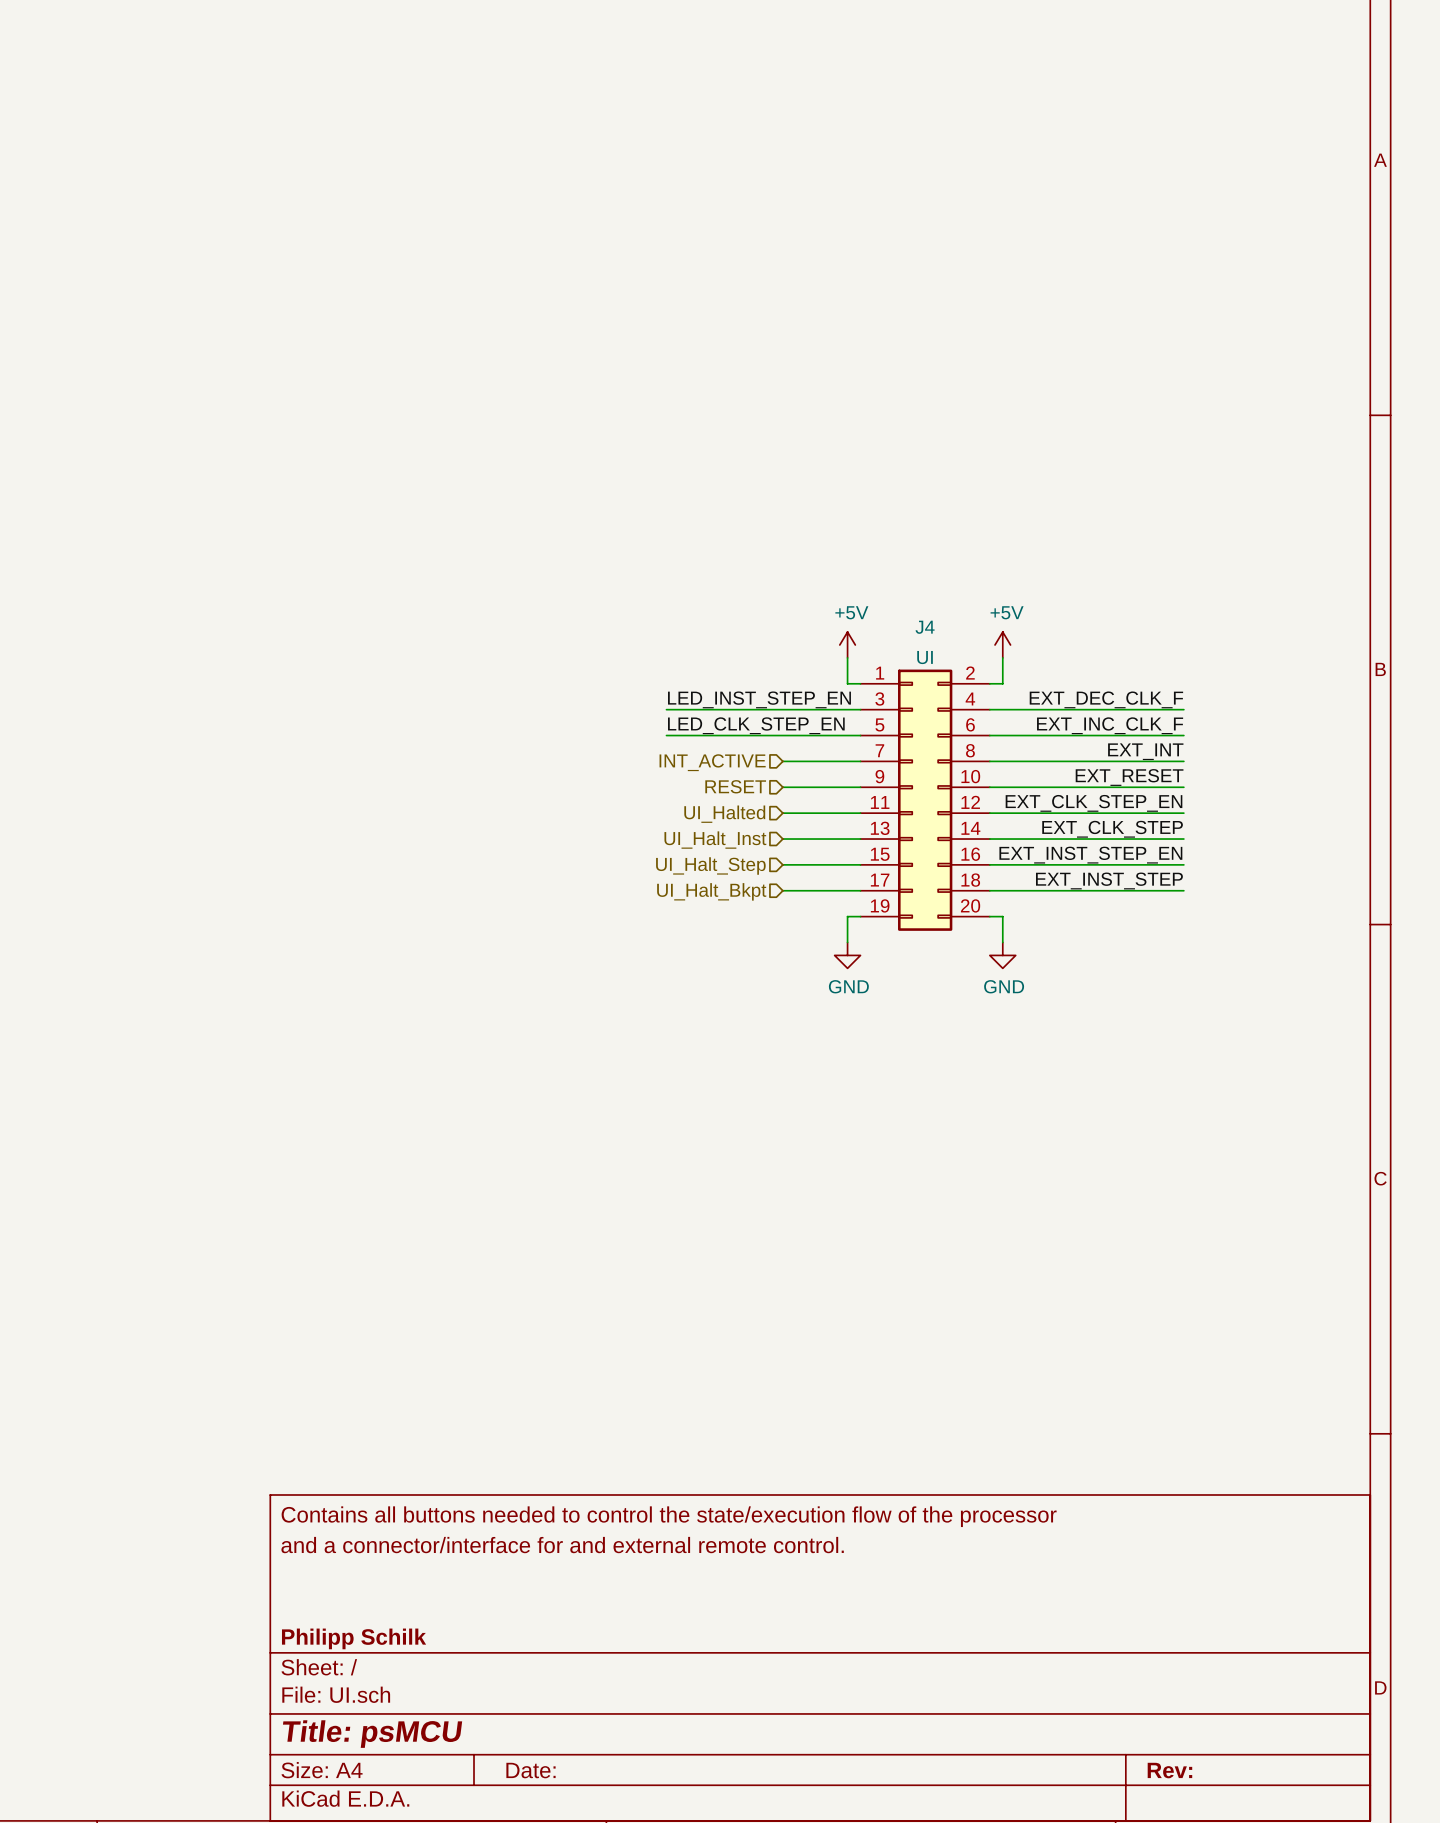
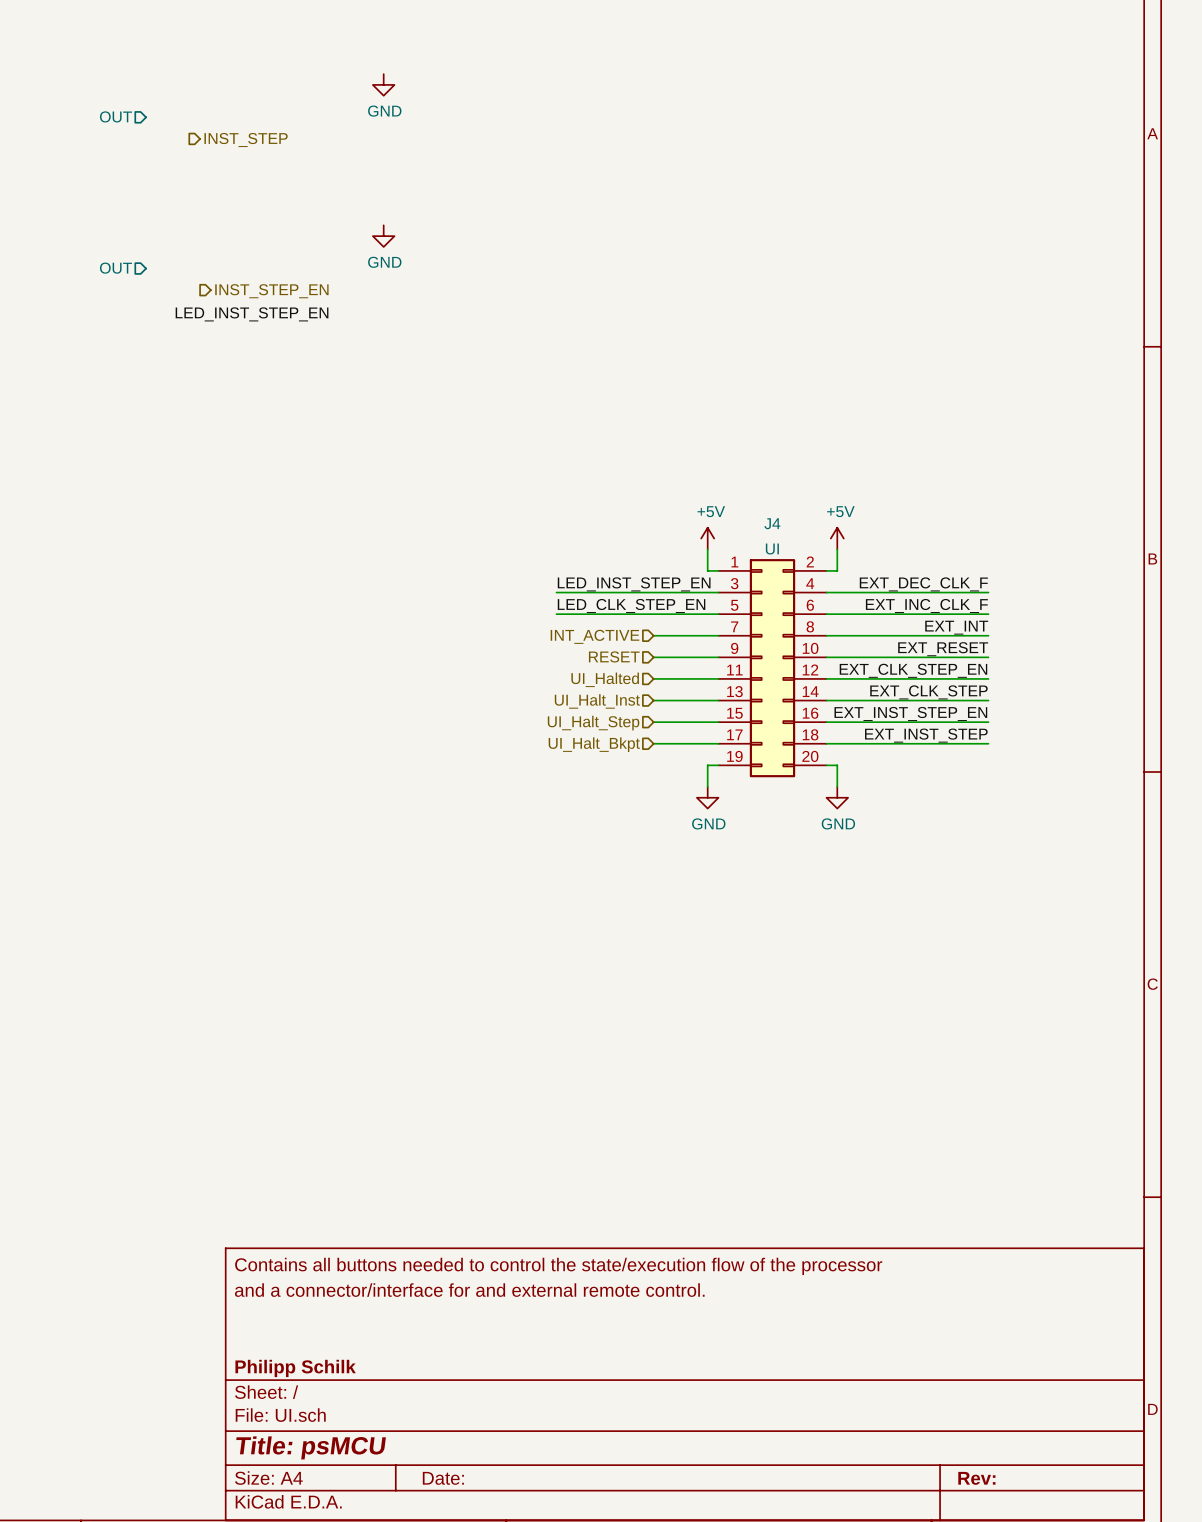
power symbol: none -> GND (383, 84)
sheet pin: none -> OUT (115, 116)
hierarchical label: none -> INST_STEP (246, 140)
power symbol: none -> GND (383, 236)
sheet pin: none -> OUT (115, 268)
hierarchical label: none -> INST_STEP_EN (271, 291)
label: none -> LED_INST_STEP_EN (252, 314)

